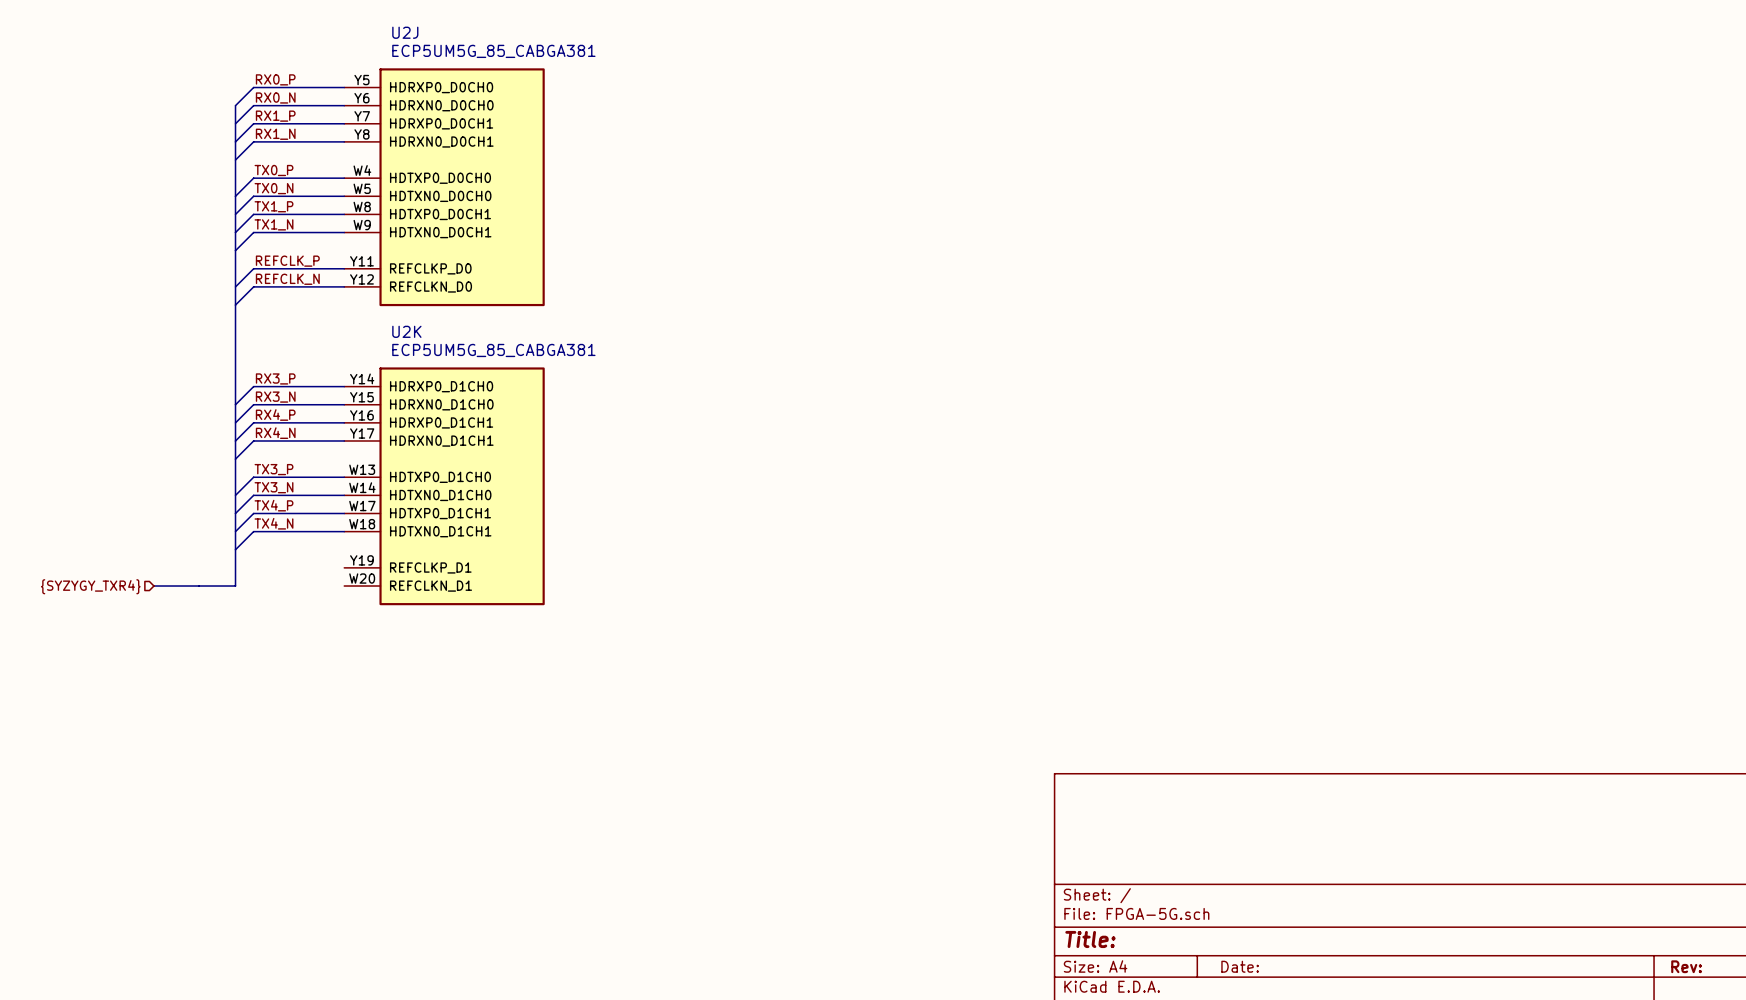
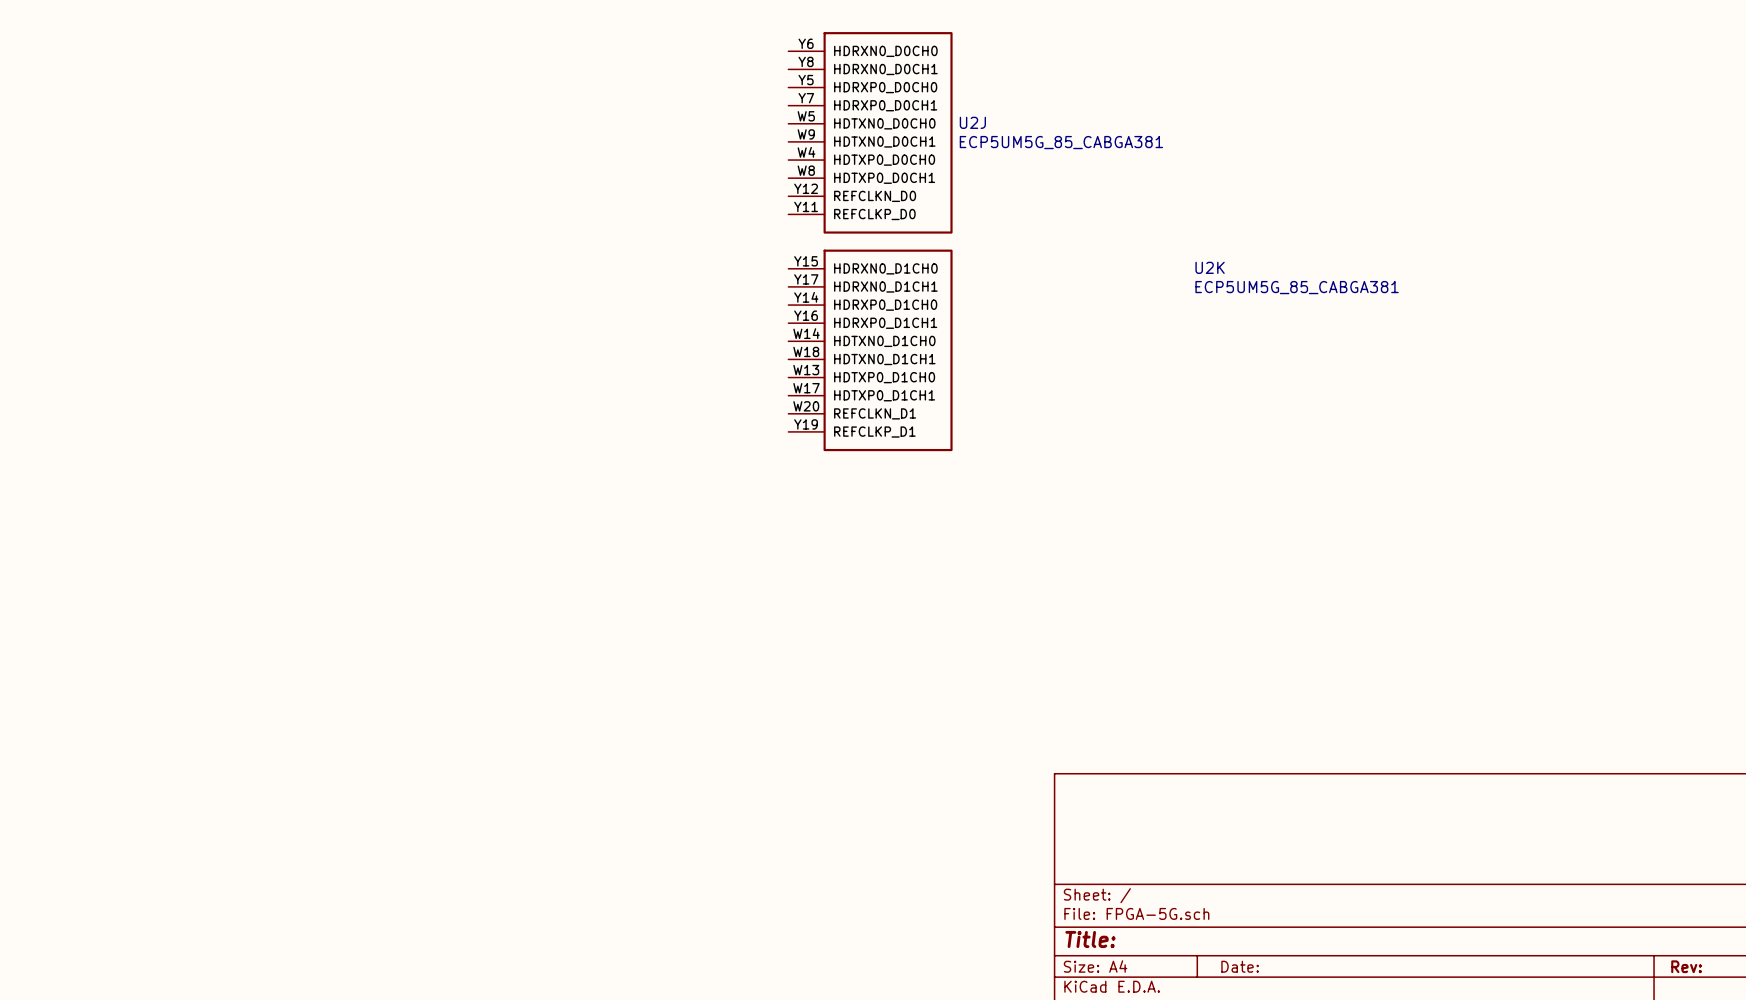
U2J name position: U2J (405, 32) -> U2J (972, 122)
U2J value position: ECP5UM5G_85_CABGA381 (493, 51) -> ECP5UM5G_85_CABGA381 (1061, 142)
U2J symbol: [344, 68, 545, 307] -> [788, 32, 953, 234]
label: RX0_P (275, 79) -> none
wire: (344, 87) (253, 87) (235, 105) -> none
label: RX0_N (275, 98) -> none
bus: (235, 105) (235, 586) (153, 586) -> none
wire: (344, 105) (253, 105) (235, 123) -> none
label: RX1_P (275, 116) -> none
wire: (344, 123) (253, 123) (235, 141) -> none
label: RX1_N (275, 134) -> none
wire: (344, 141) (253, 141) (235, 160) -> none
label: TX0_P (273, 170) -> none
wire: (344, 178) (253, 178) (235, 196) -> none
label: TX0_N (273, 188) -> none
wire: (344, 196) (253, 196) (235, 214) -> none
label: TX1_P (273, 206) -> none
wire: (344, 214) (253, 214) (235, 232) -> none
label: TX1_N (273, 224) -> none
wire: (344, 232) (253, 232) (235, 250) -> none
label: REFCLK_P (287, 261) -> none
wire: (344, 268) (253, 268) (235, 286) -> none
label: REFCLK_N (287, 279) -> none
wire: (344, 286) (253, 286) (235, 305) -> none
U2K name position: U2K (406, 331) -> U2K (1210, 267)
U2K value position: ECP5UM5G_85_CABGA381 (493, 350) -> ECP5UM5G_85_CABGA381 (1297, 287)
U2K symbol: [344, 367, 545, 606] -> [788, 249, 953, 452]
label: RX3_P (275, 378) -> none
wire: (344, 386) (253, 386) (235, 404) -> none
label: RX3_N (275, 397) -> none
wire: (344, 404) (253, 404) (235, 422) -> none
label: RX4_P (275, 414) -> none
wire: (344, 422) (253, 422) (235, 440) -> none
label: RX4_N (275, 433) -> none
wire: (344, 440) (253, 440) (235, 459) -> none
label: TX3_P (273, 469) -> none
wire: (344, 477) (253, 477) (235, 495) -> none
label: TX3_N (273, 487) -> none
wire: (344, 495) (253, 495) (235, 513) -> none
label: TX4_P (273, 505) -> none
wire: (344, 513) (253, 513) (235, 531) -> none
label: TX4_N (273, 523) -> none
wire: (344, 531) (253, 531) (235, 549) -> none
hierarchical label: {SYZYGY_TXR4} (90, 586) -> none

